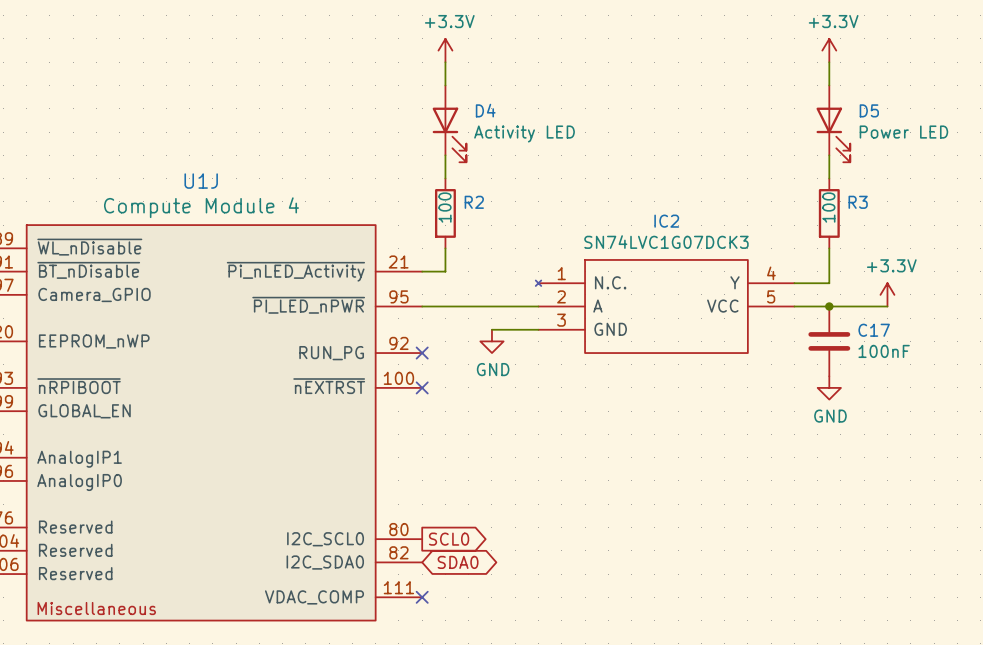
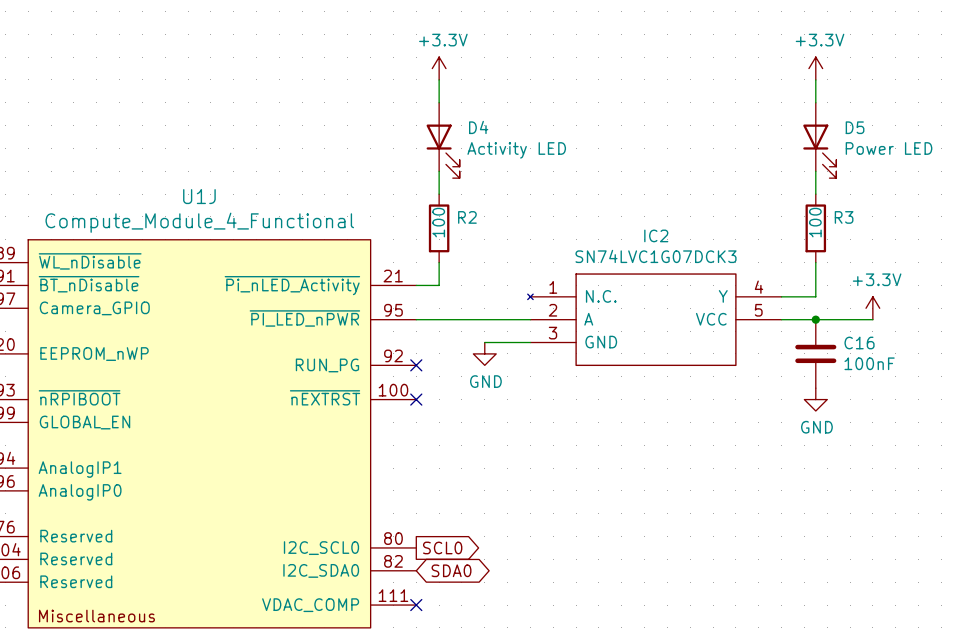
U1J value: Compute Module 4 (201, 207) -> Compute_Module_4_Functional (199, 222)
C17 name: C17 (874, 330) -> C16 (859, 342)

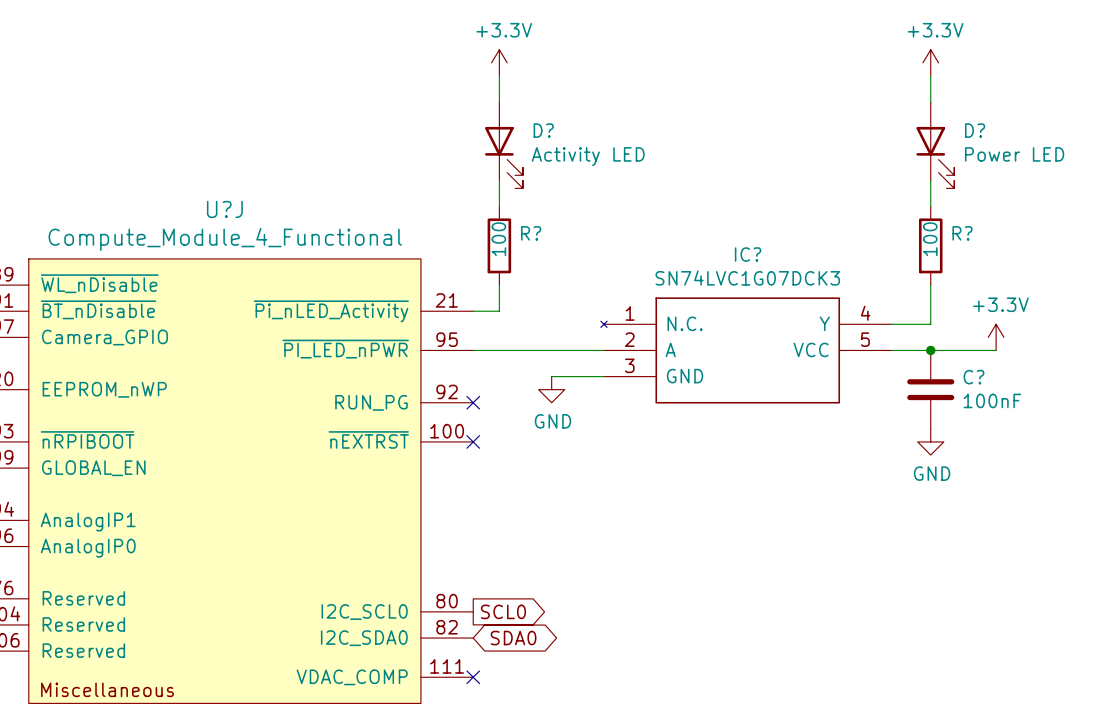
D4 name: D4 (478, 127) -> D? (543, 130)
D5 name: D5 (855, 127) -> D? (975, 130)
U1J name: U1J (199, 196) -> U?J (224, 209)
R2 name: R2 (467, 217) -> R? (531, 233)
R3 name: R3 (844, 217) -> R? (962, 233)
IC2 name: IC2 (656, 235) -> IC? (748, 254)
C16 name: C16 (859, 342) -> C? (973, 377)

